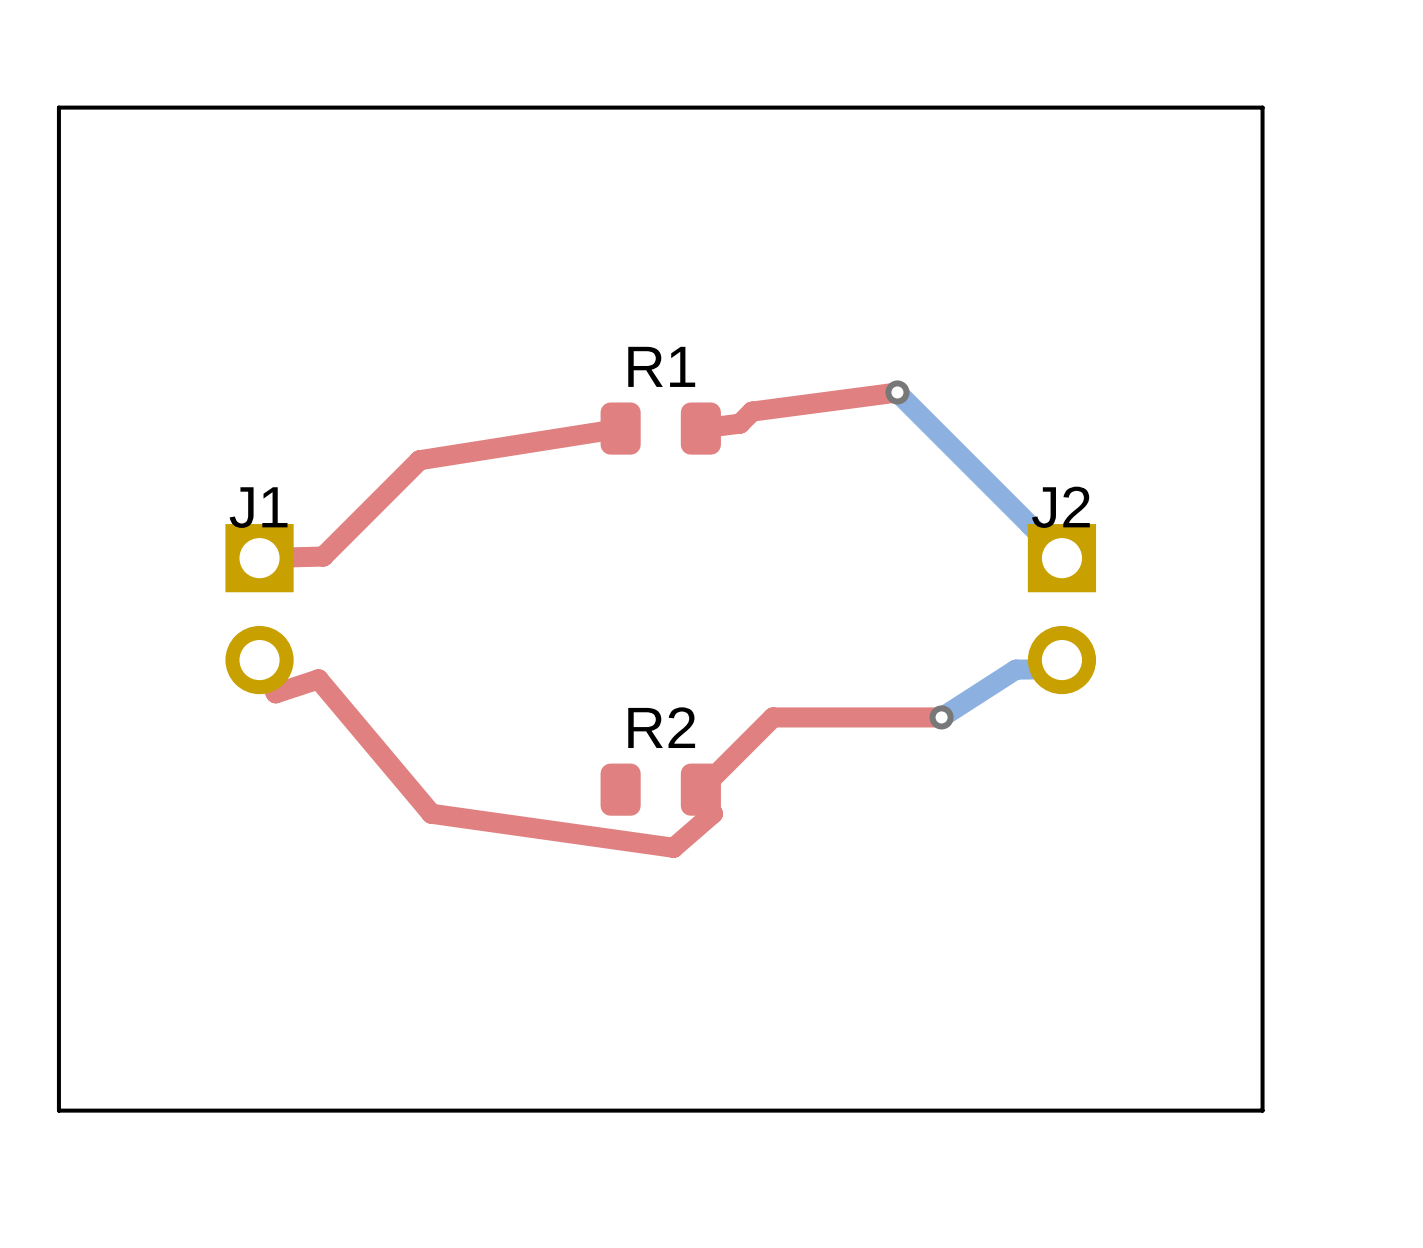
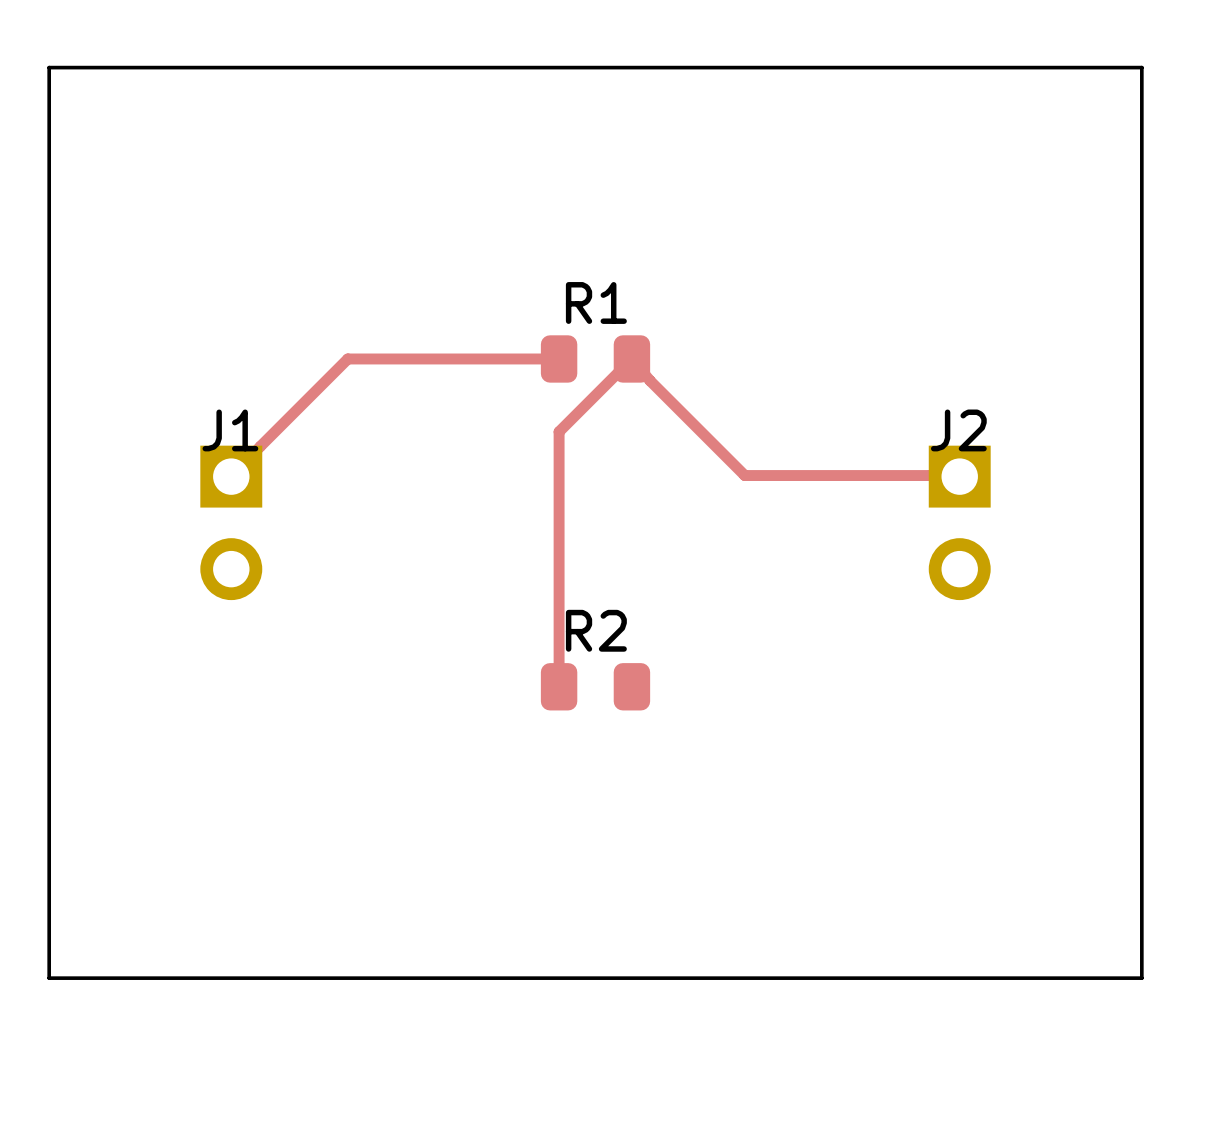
top track: (897, 392) (752, 411) (740, 423) (700, 428) -> none
bottom track: (897, 392) (1061, 558) -> none
via: (897, 392) -> none
top track: (620, 428) (419, 460) (323, 556) (259, 558) -> (559, 358) (347, 358) (231, 476)
top track: none -> (959, 476) (744, 475) (650, 380) (631, 358) (559, 431) (559, 686)
top track: (259, 660) (275, 693) (318, 679) (431, 813) (673, 847) (712, 813) (700, 789) (773, 717) (941, 717) -> none
bottom track: (1061, 660) (1044, 669) (1015, 669) (941, 717) -> none
via: (941, 717) -> none

